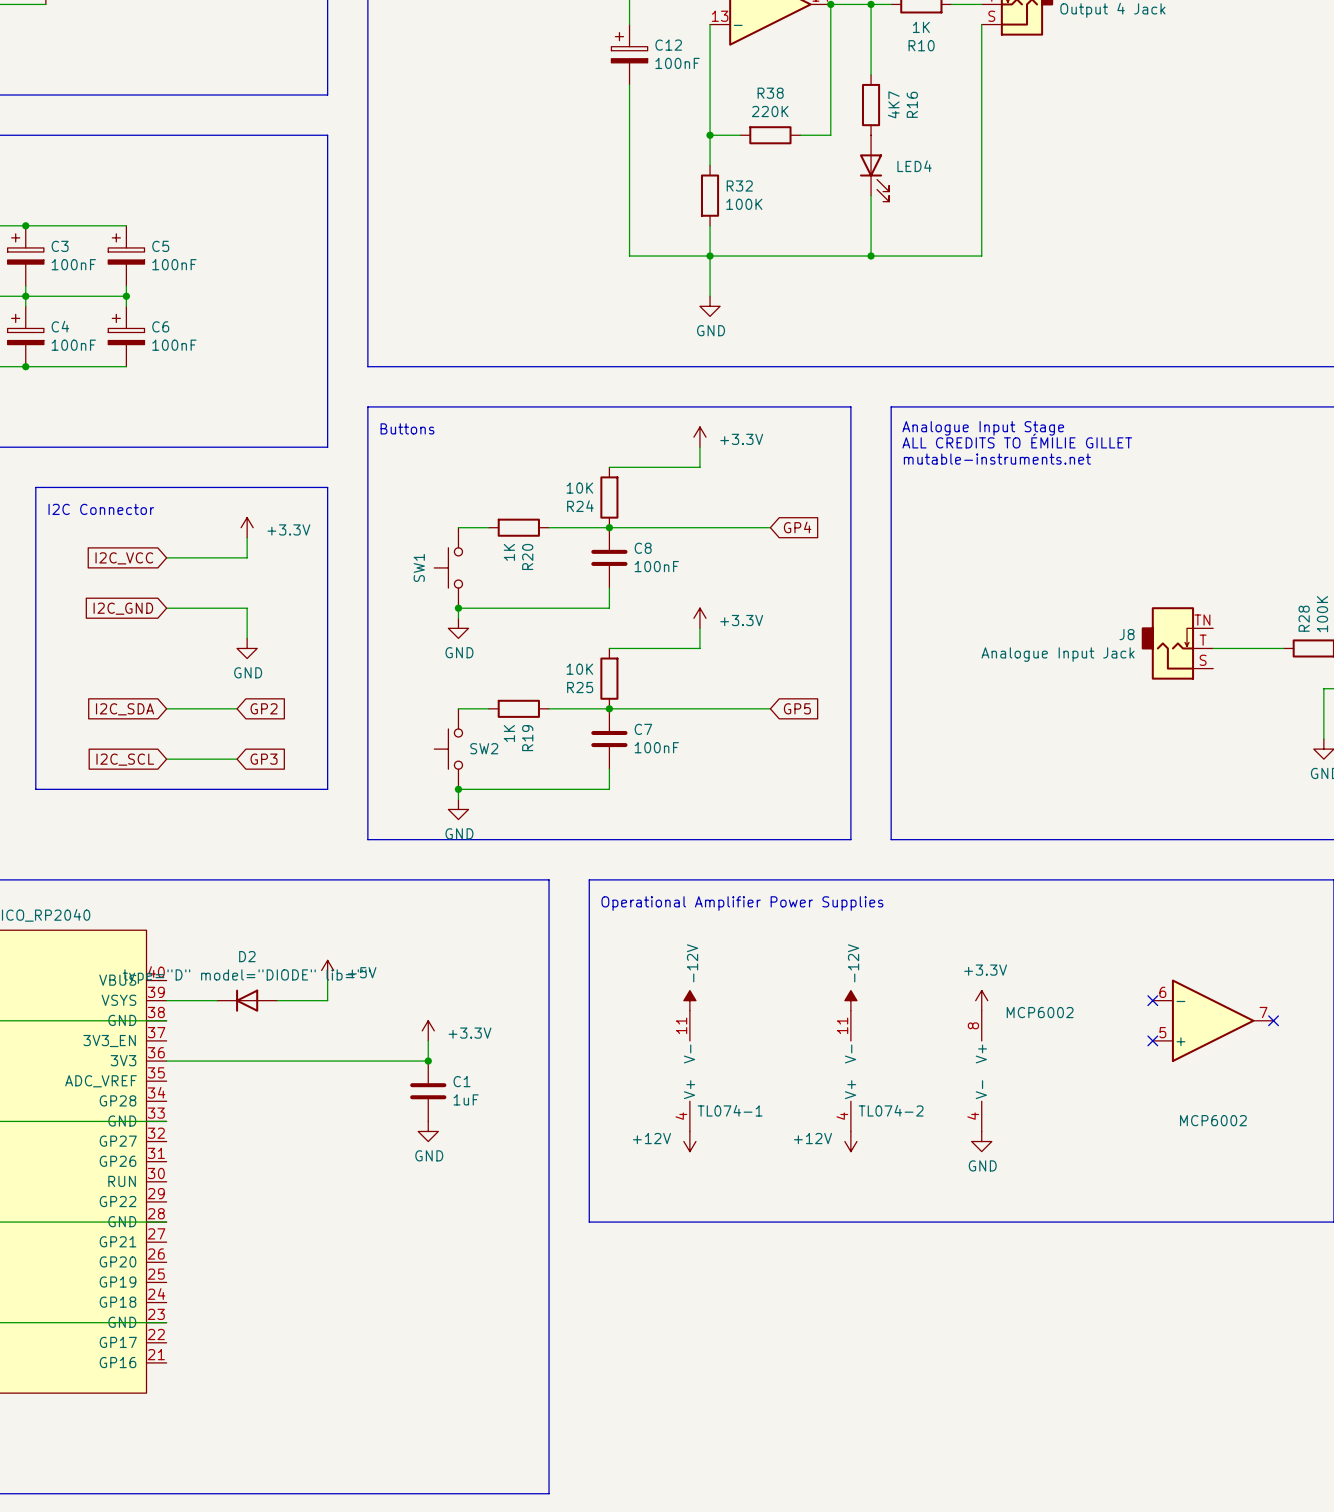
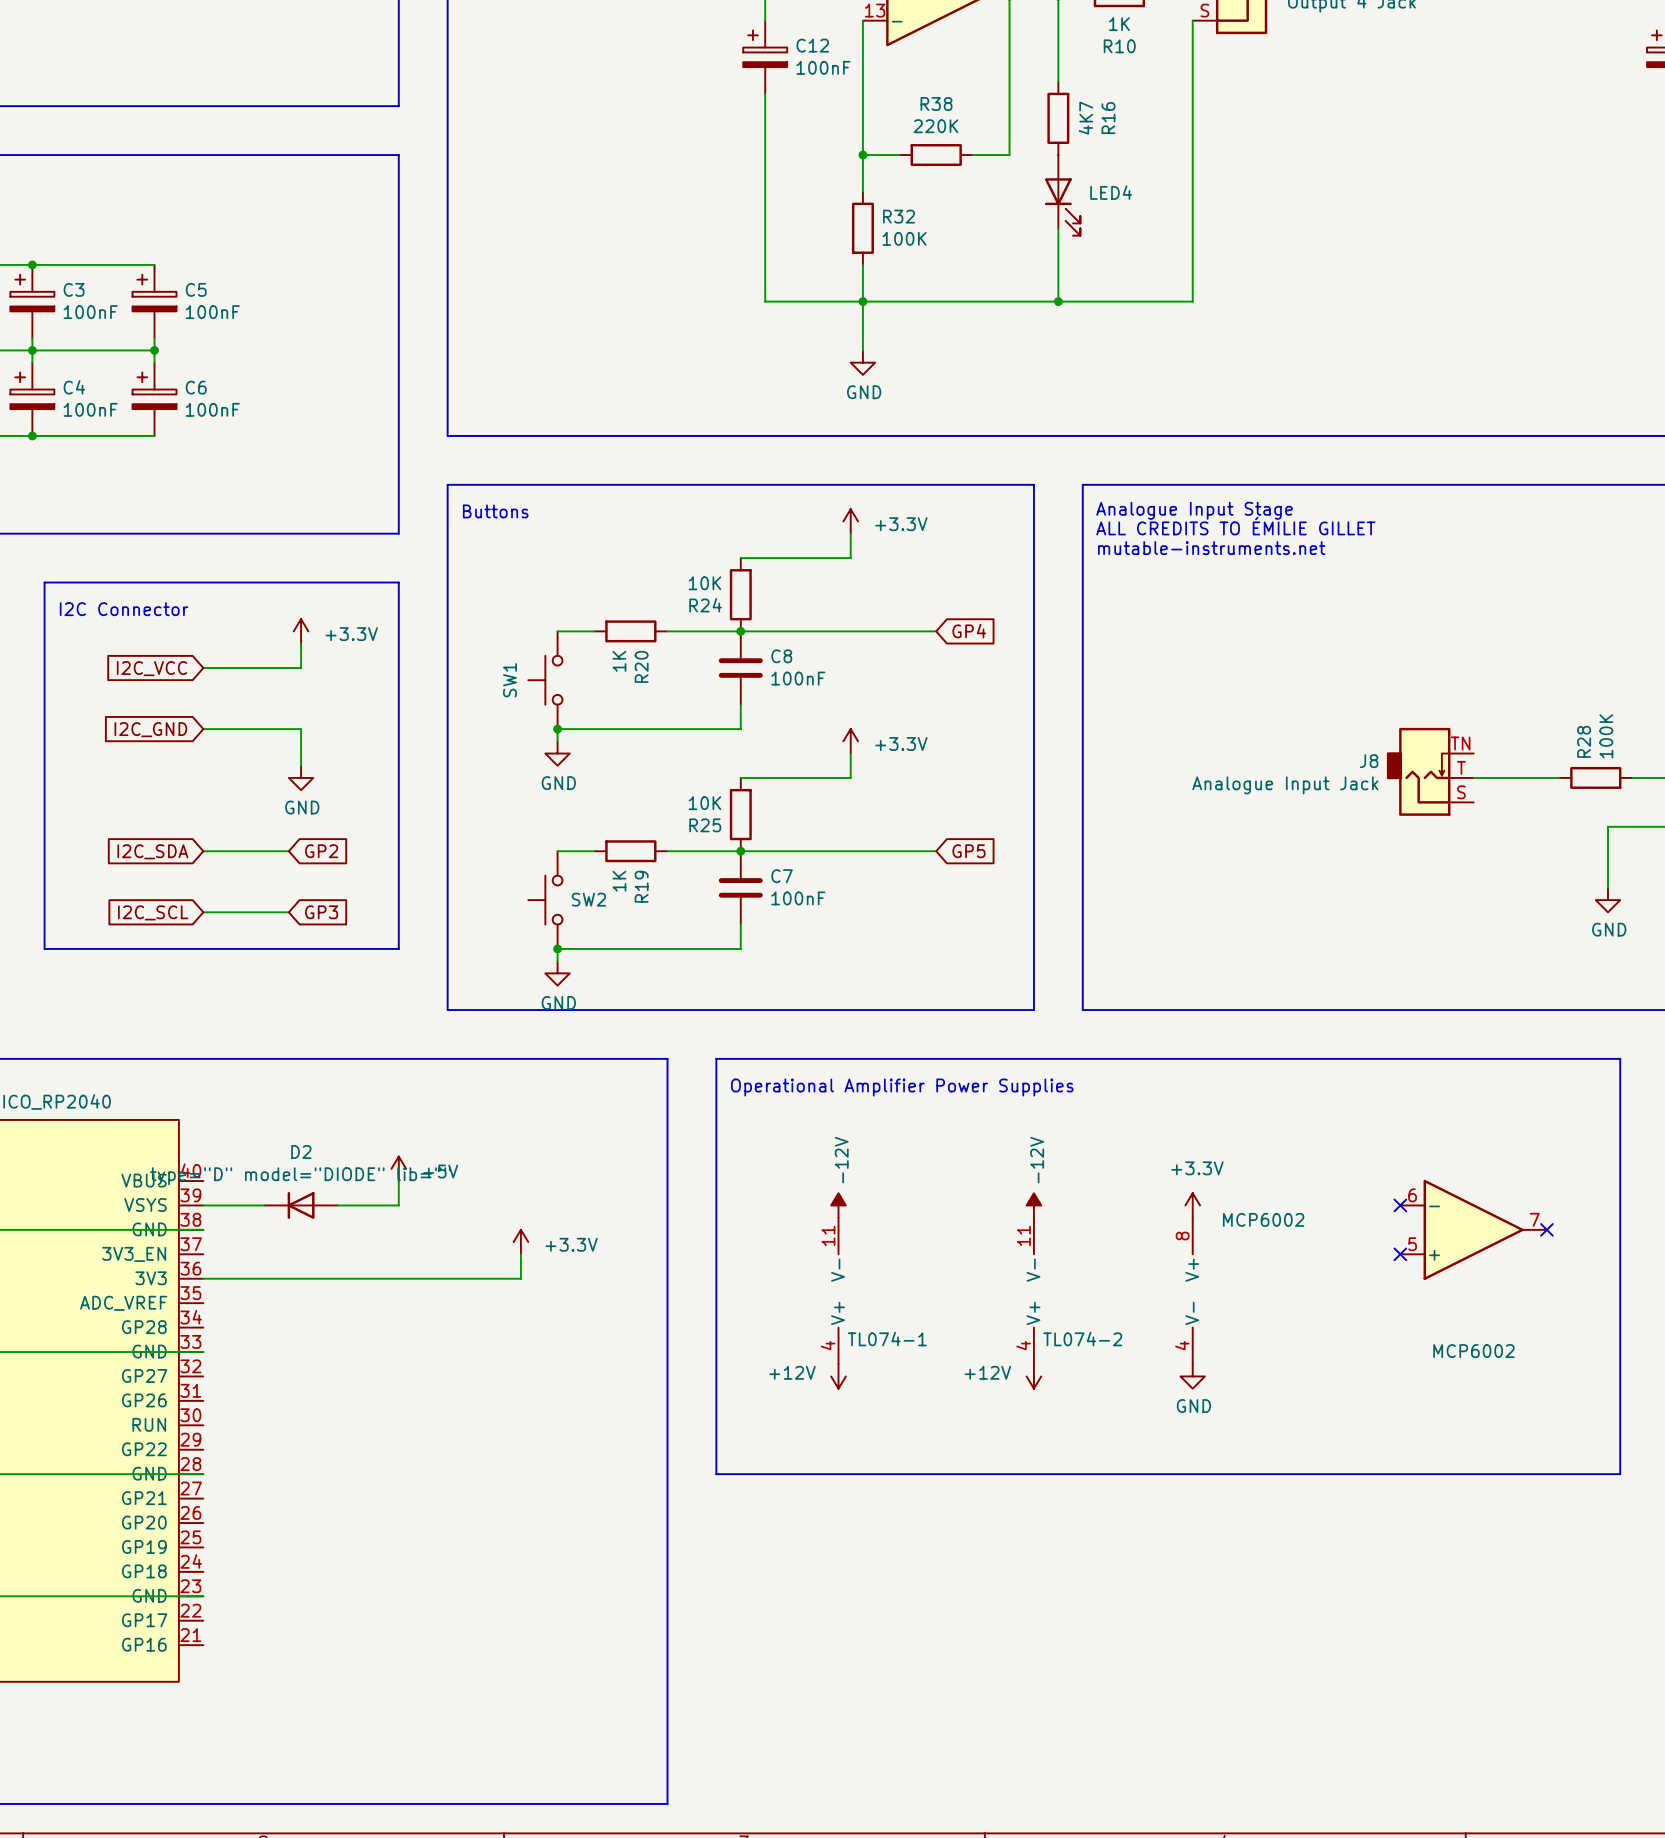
junction: (428, 1061) -> none
C1: 1uF (428, 1091) -> none
power symbol: GND (428, 1131) -> none

